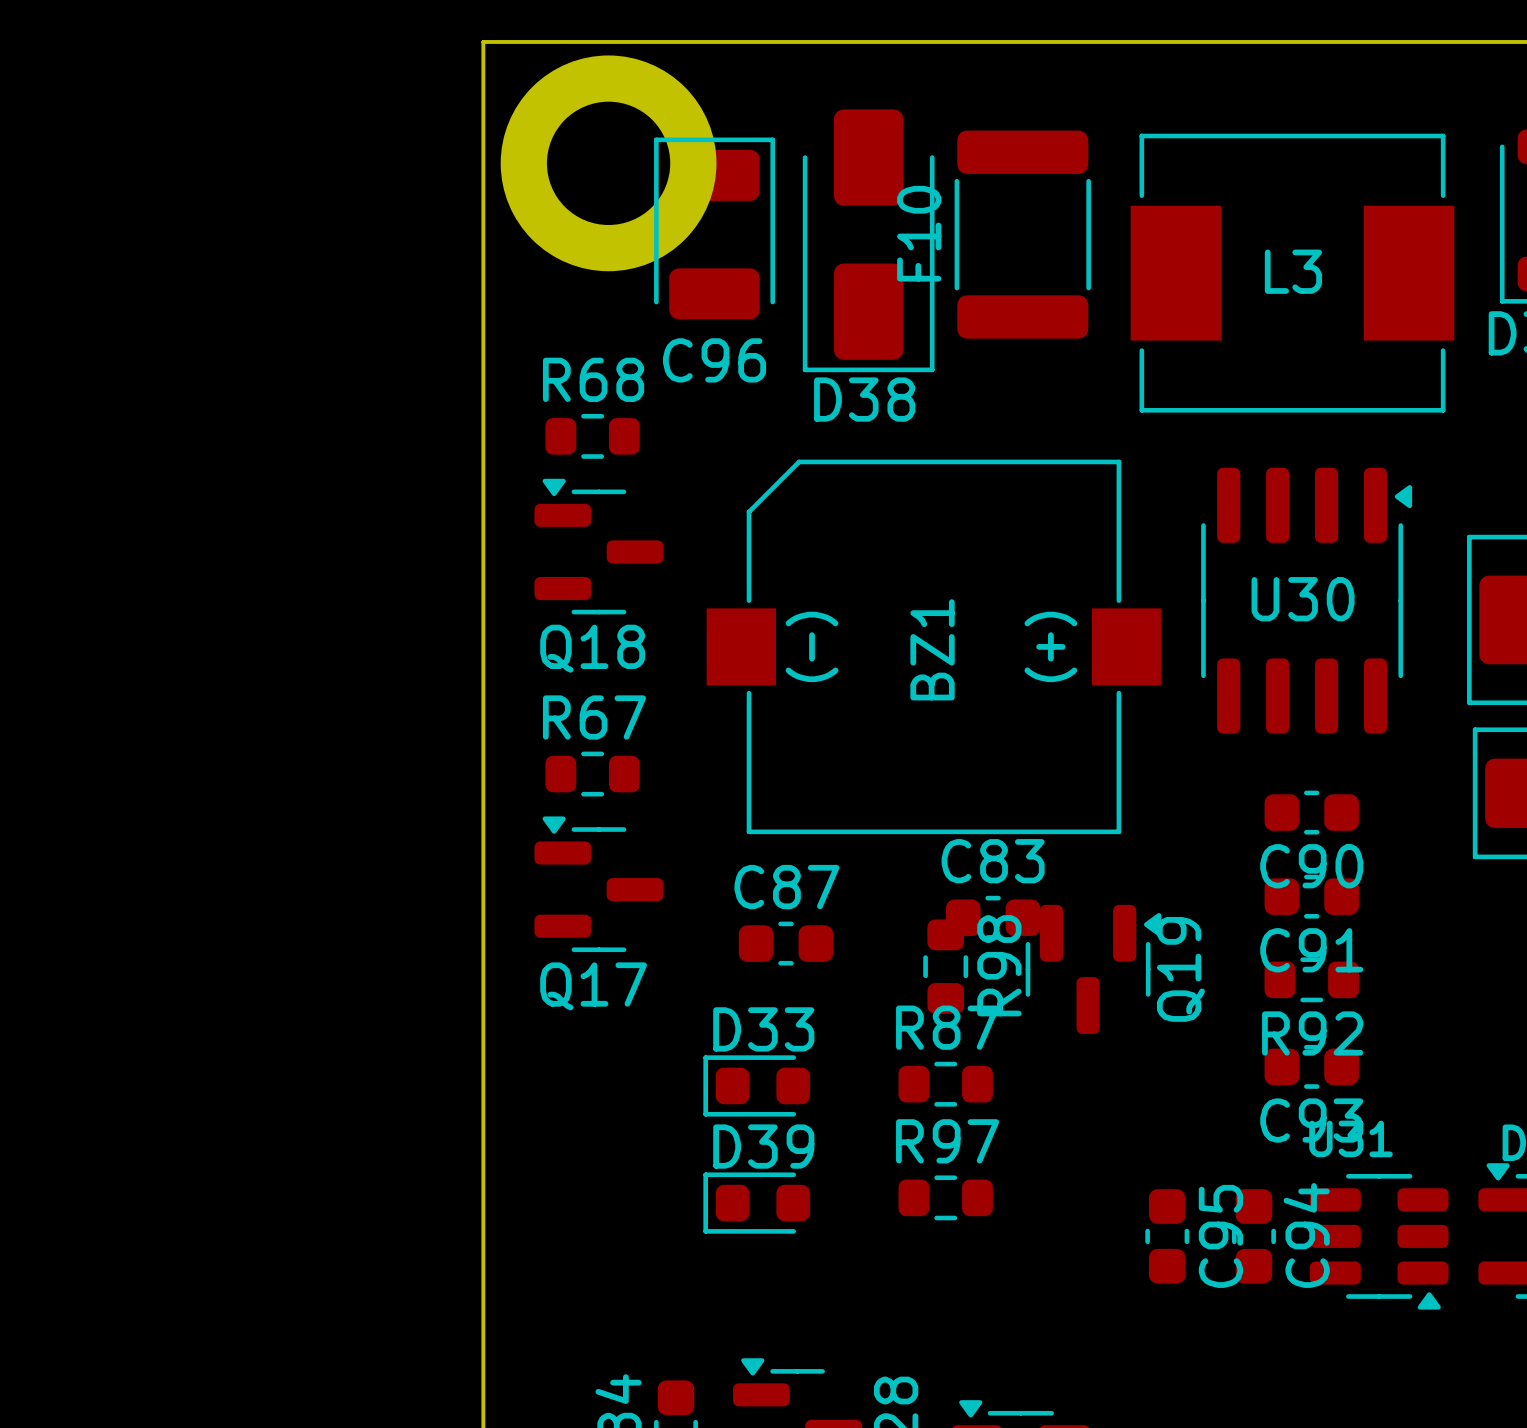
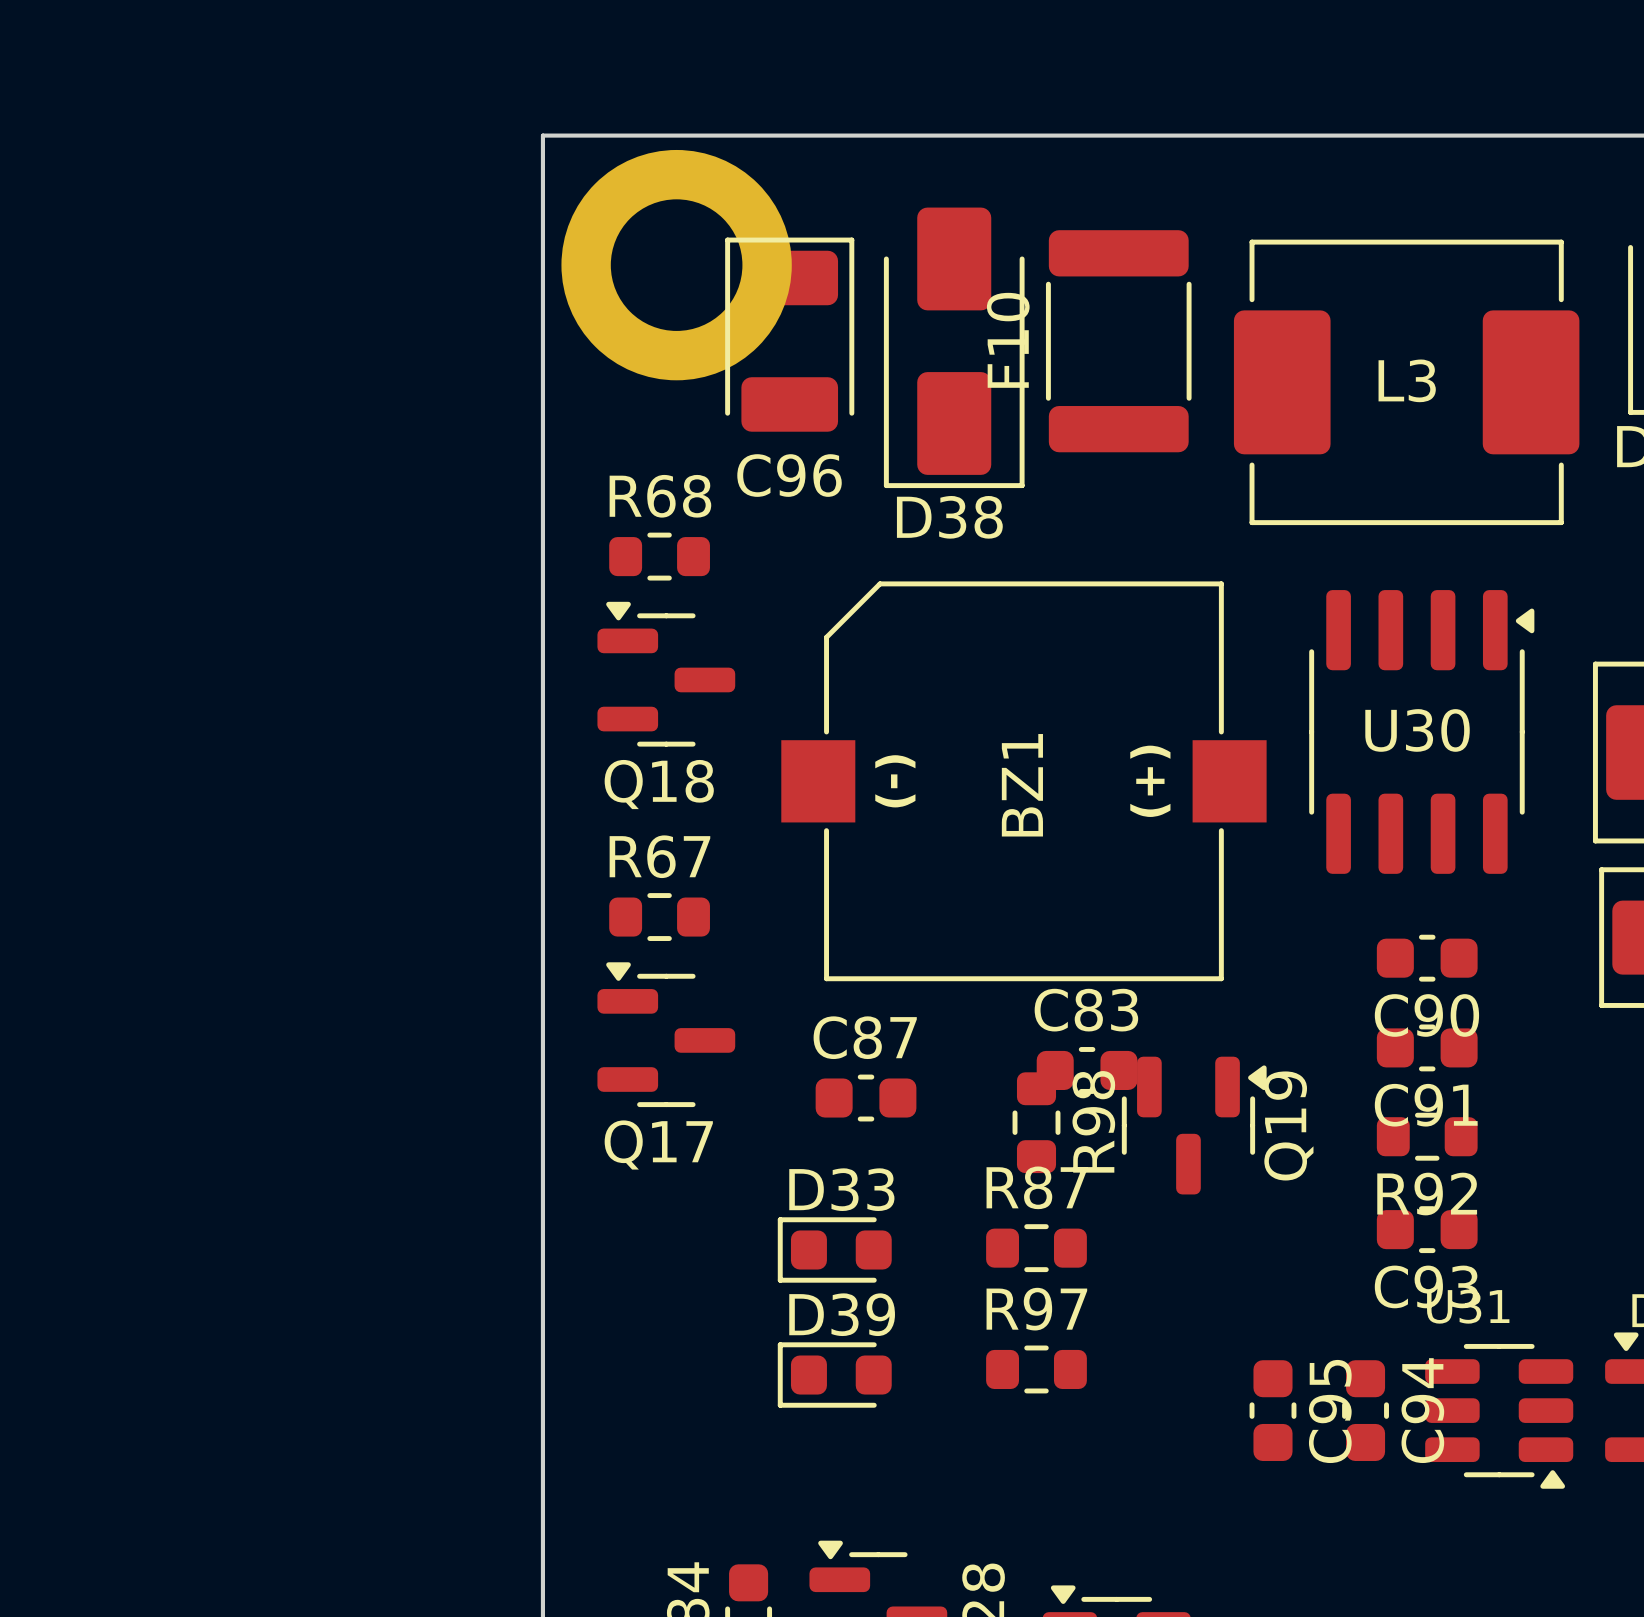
L3 footprint: [1130, 133, 1455, 413] -> [1233, 239, 1580, 526]

